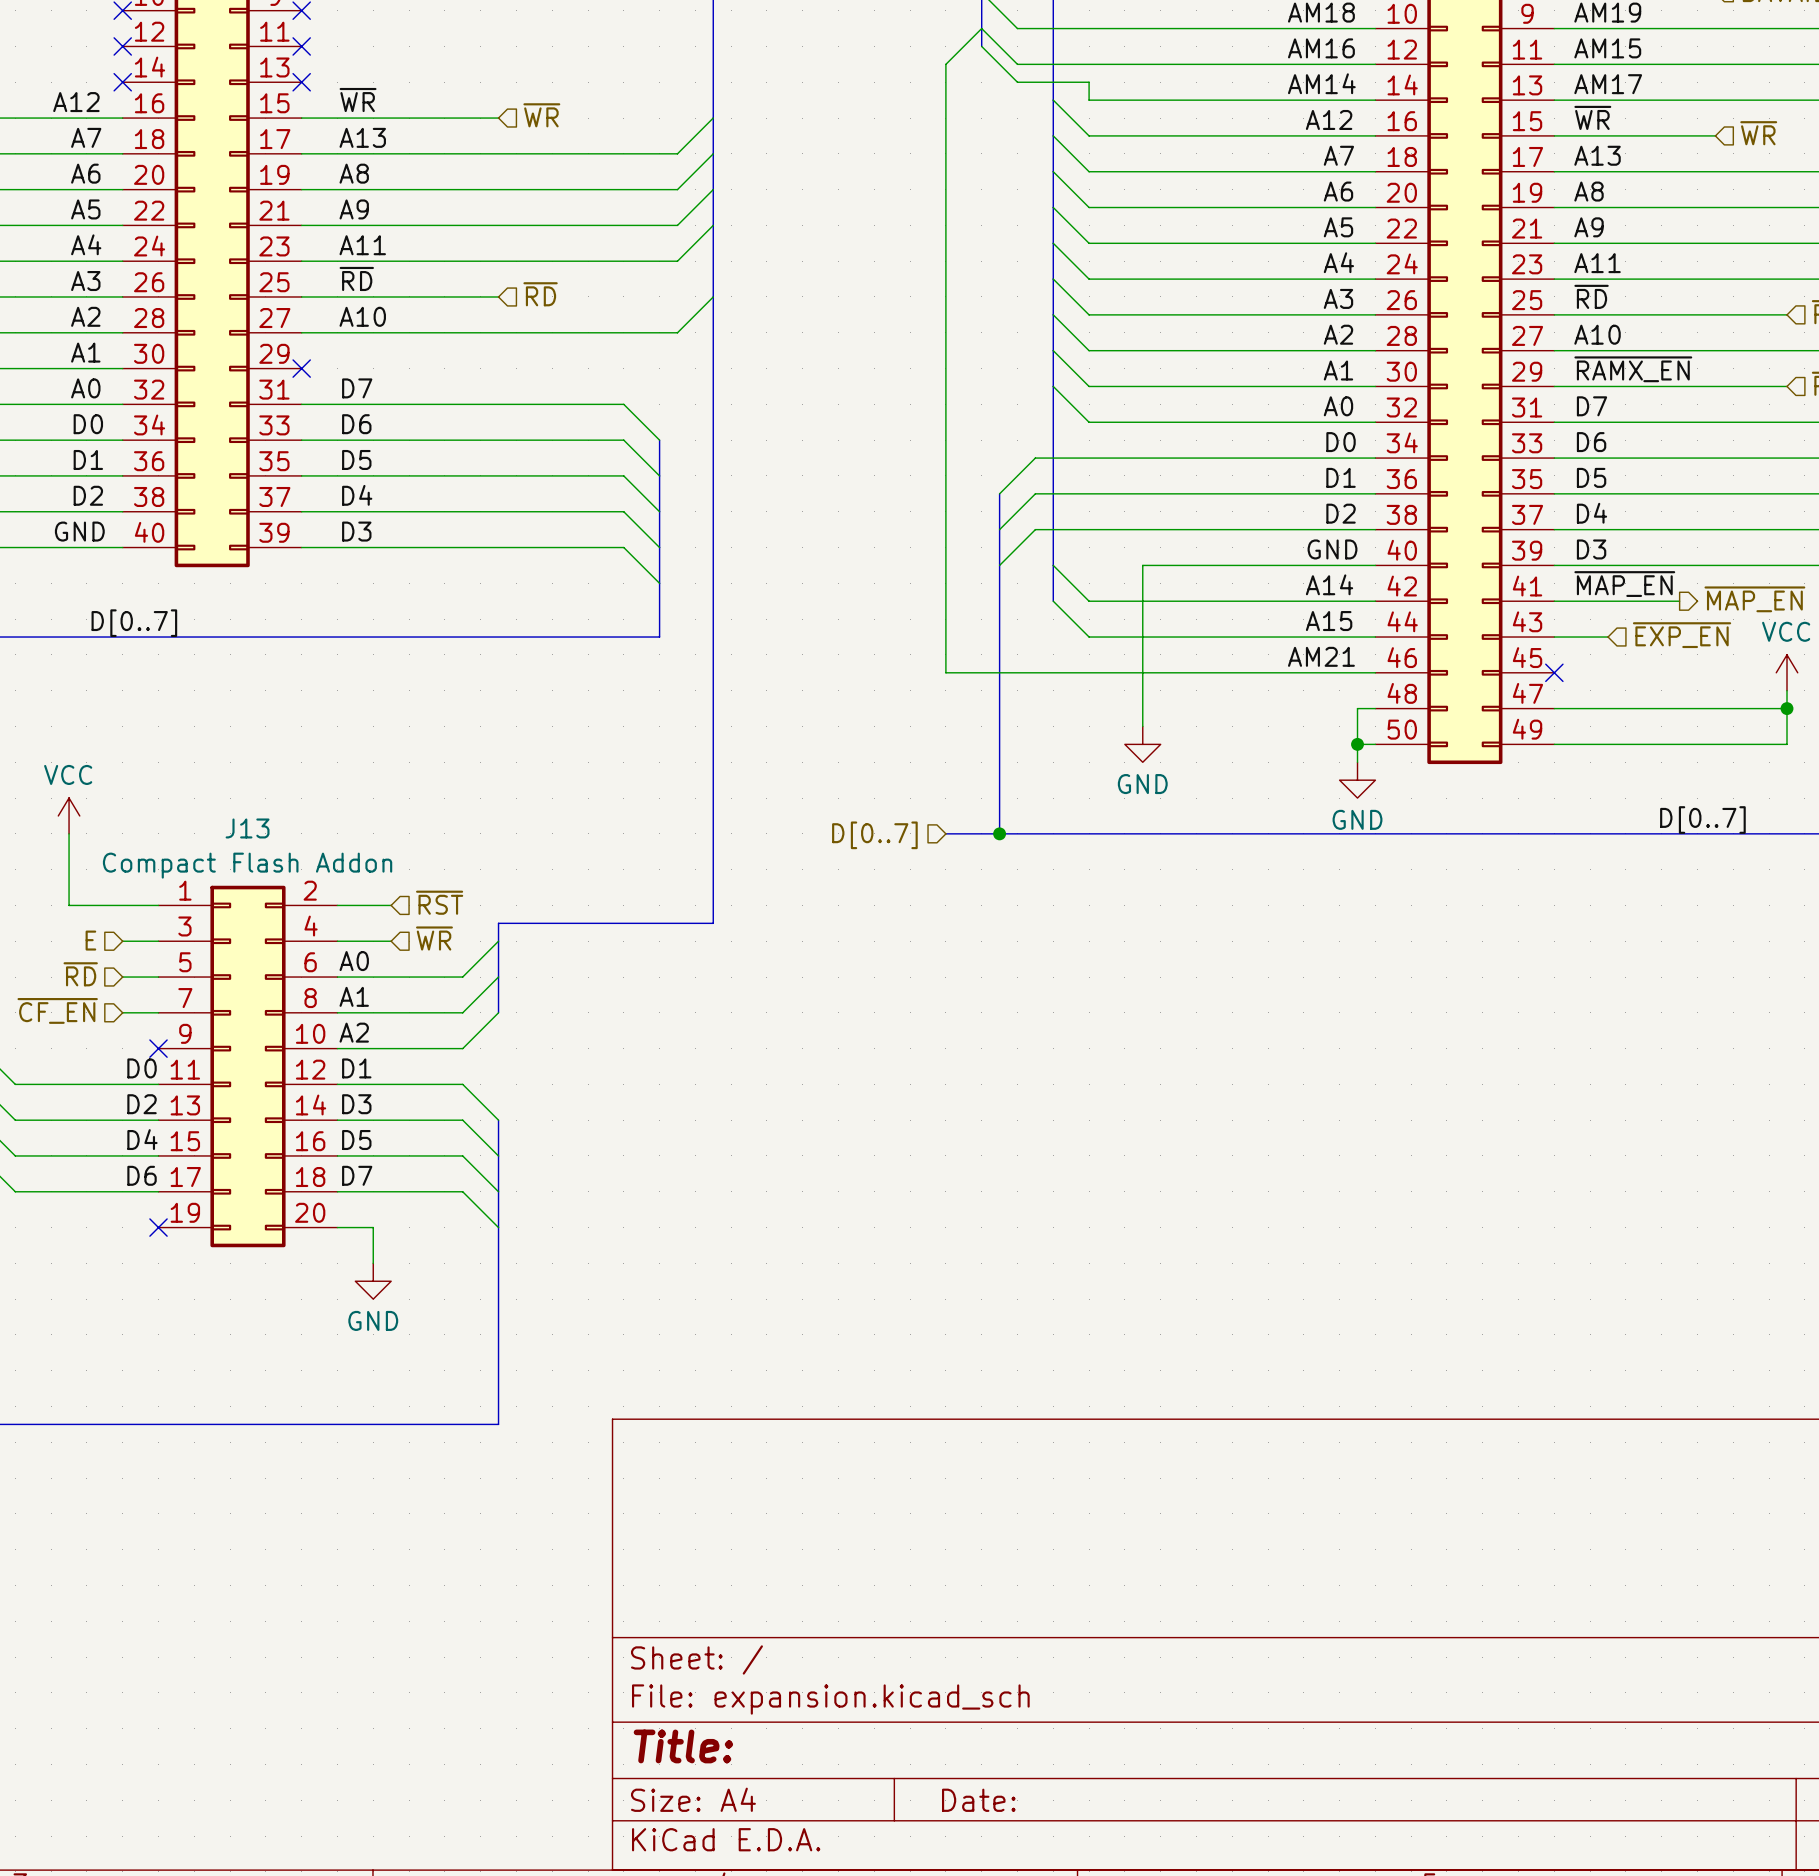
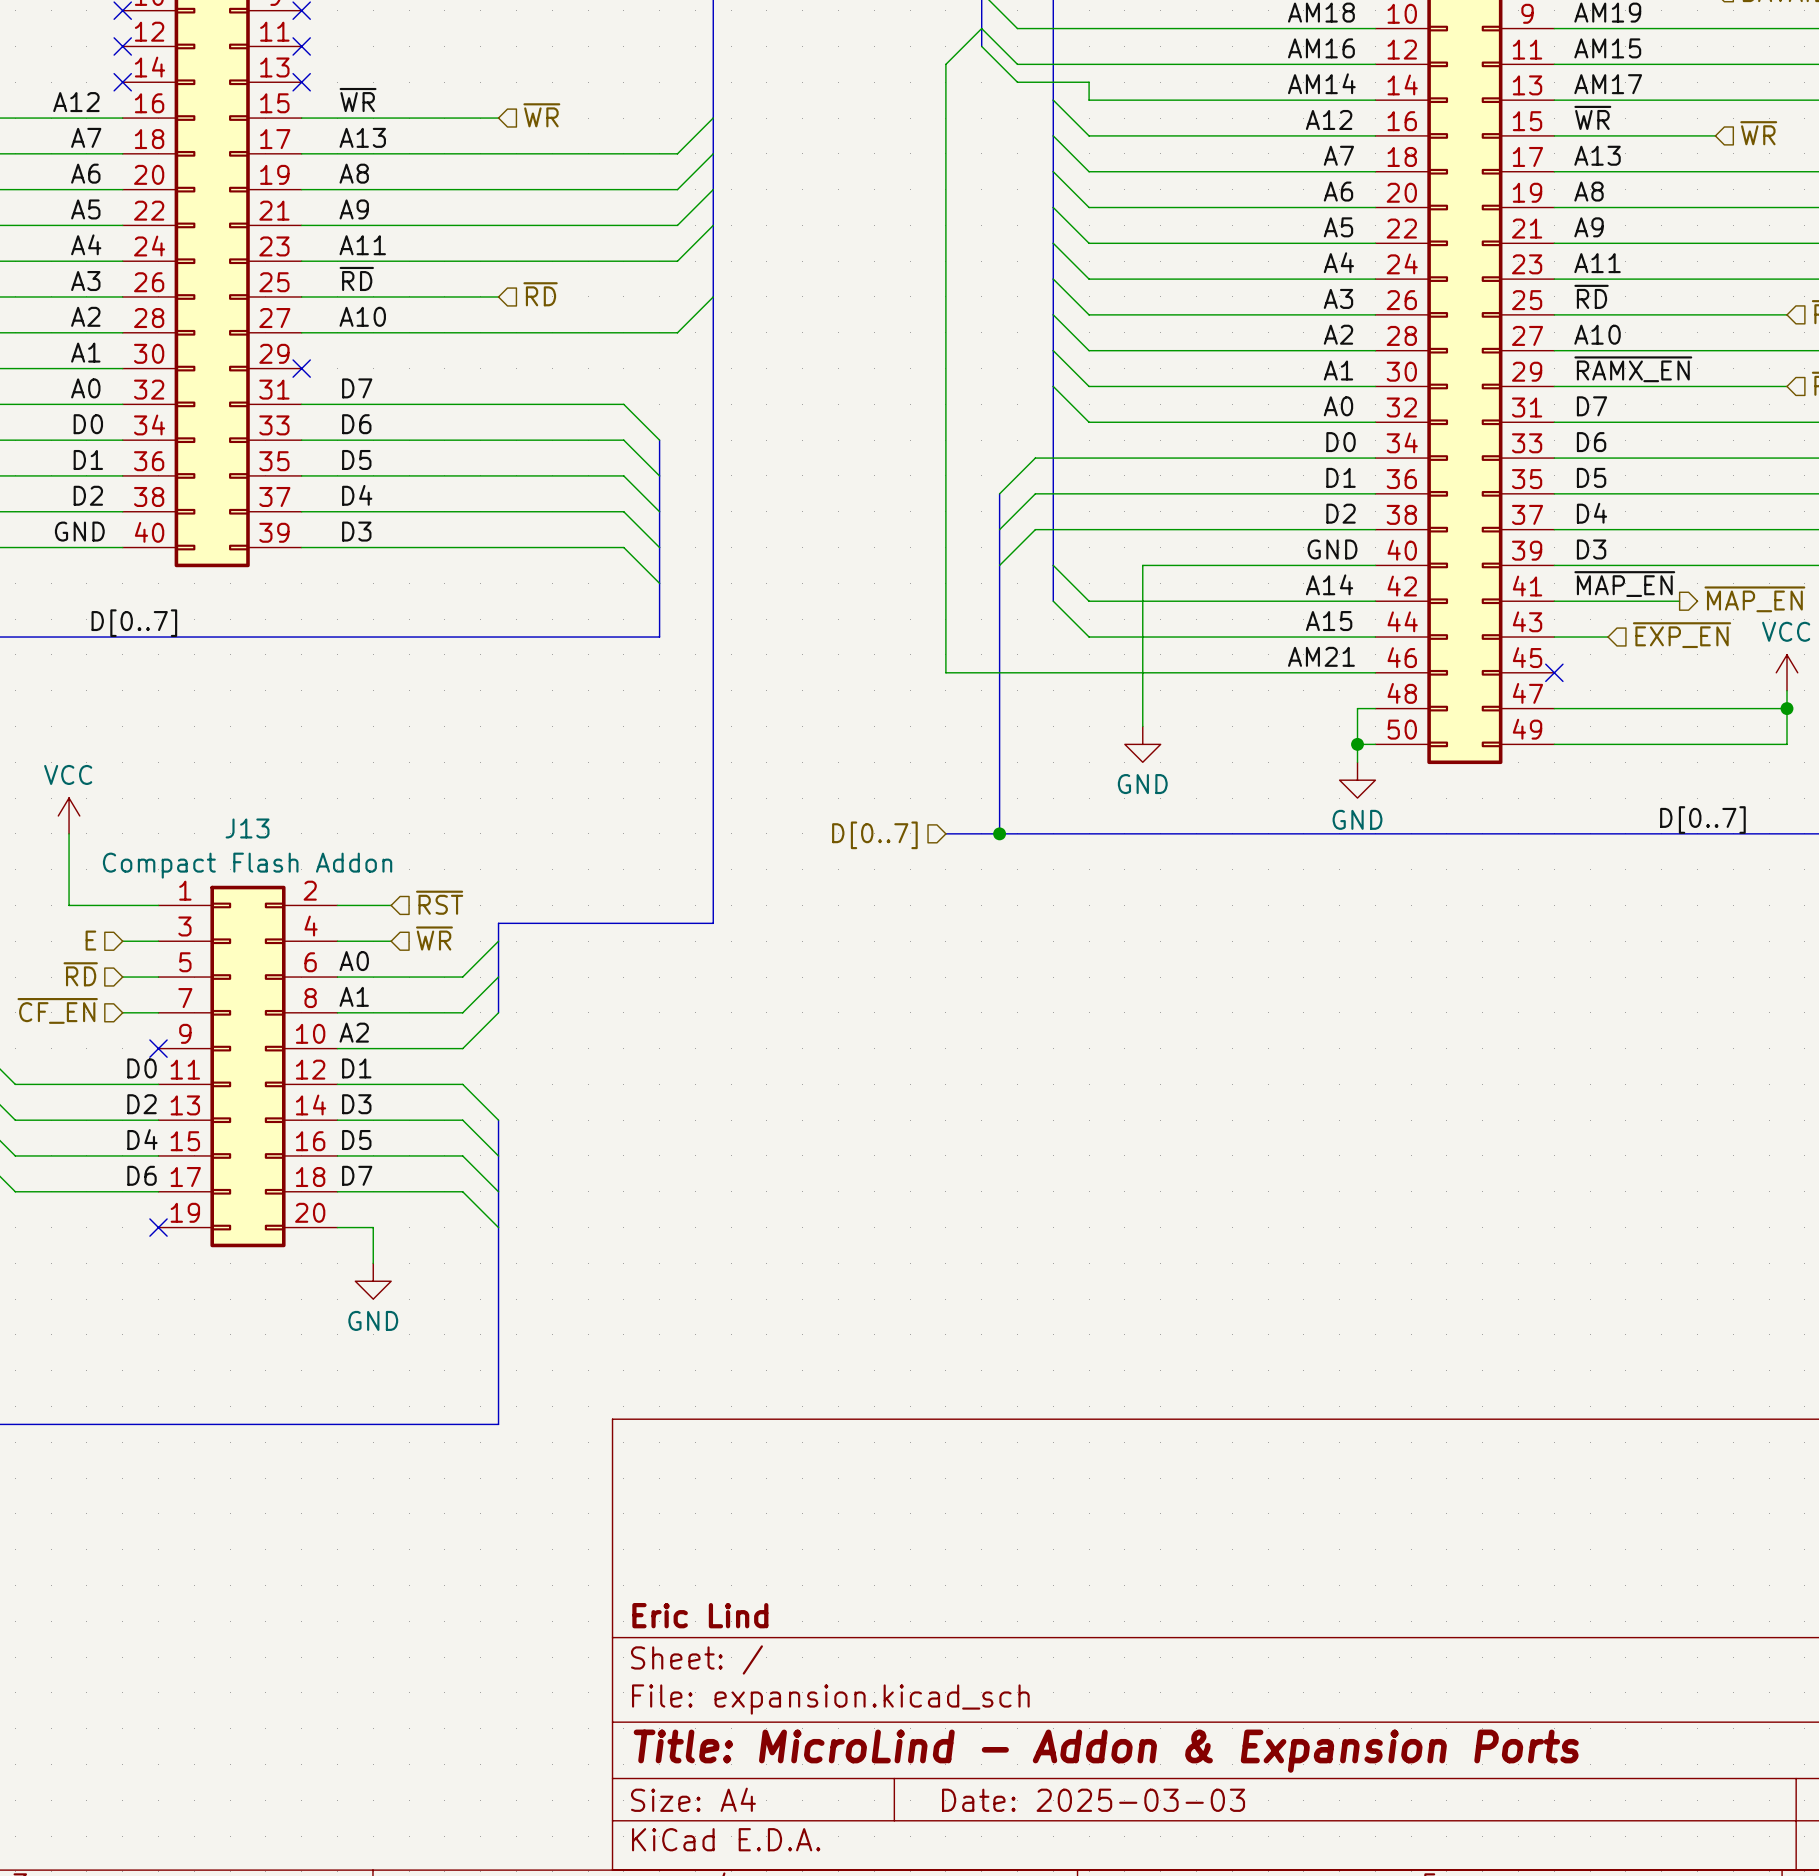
title block: none -> Eric Lind (700, 1615)
title block: Title: (683, 1746) -> Title: MicroLind - Addon & Expansion Ports (1106, 1751)
title block: Date: (978, 1800) -> Date: 2025-03-03 (1093, 1800)

